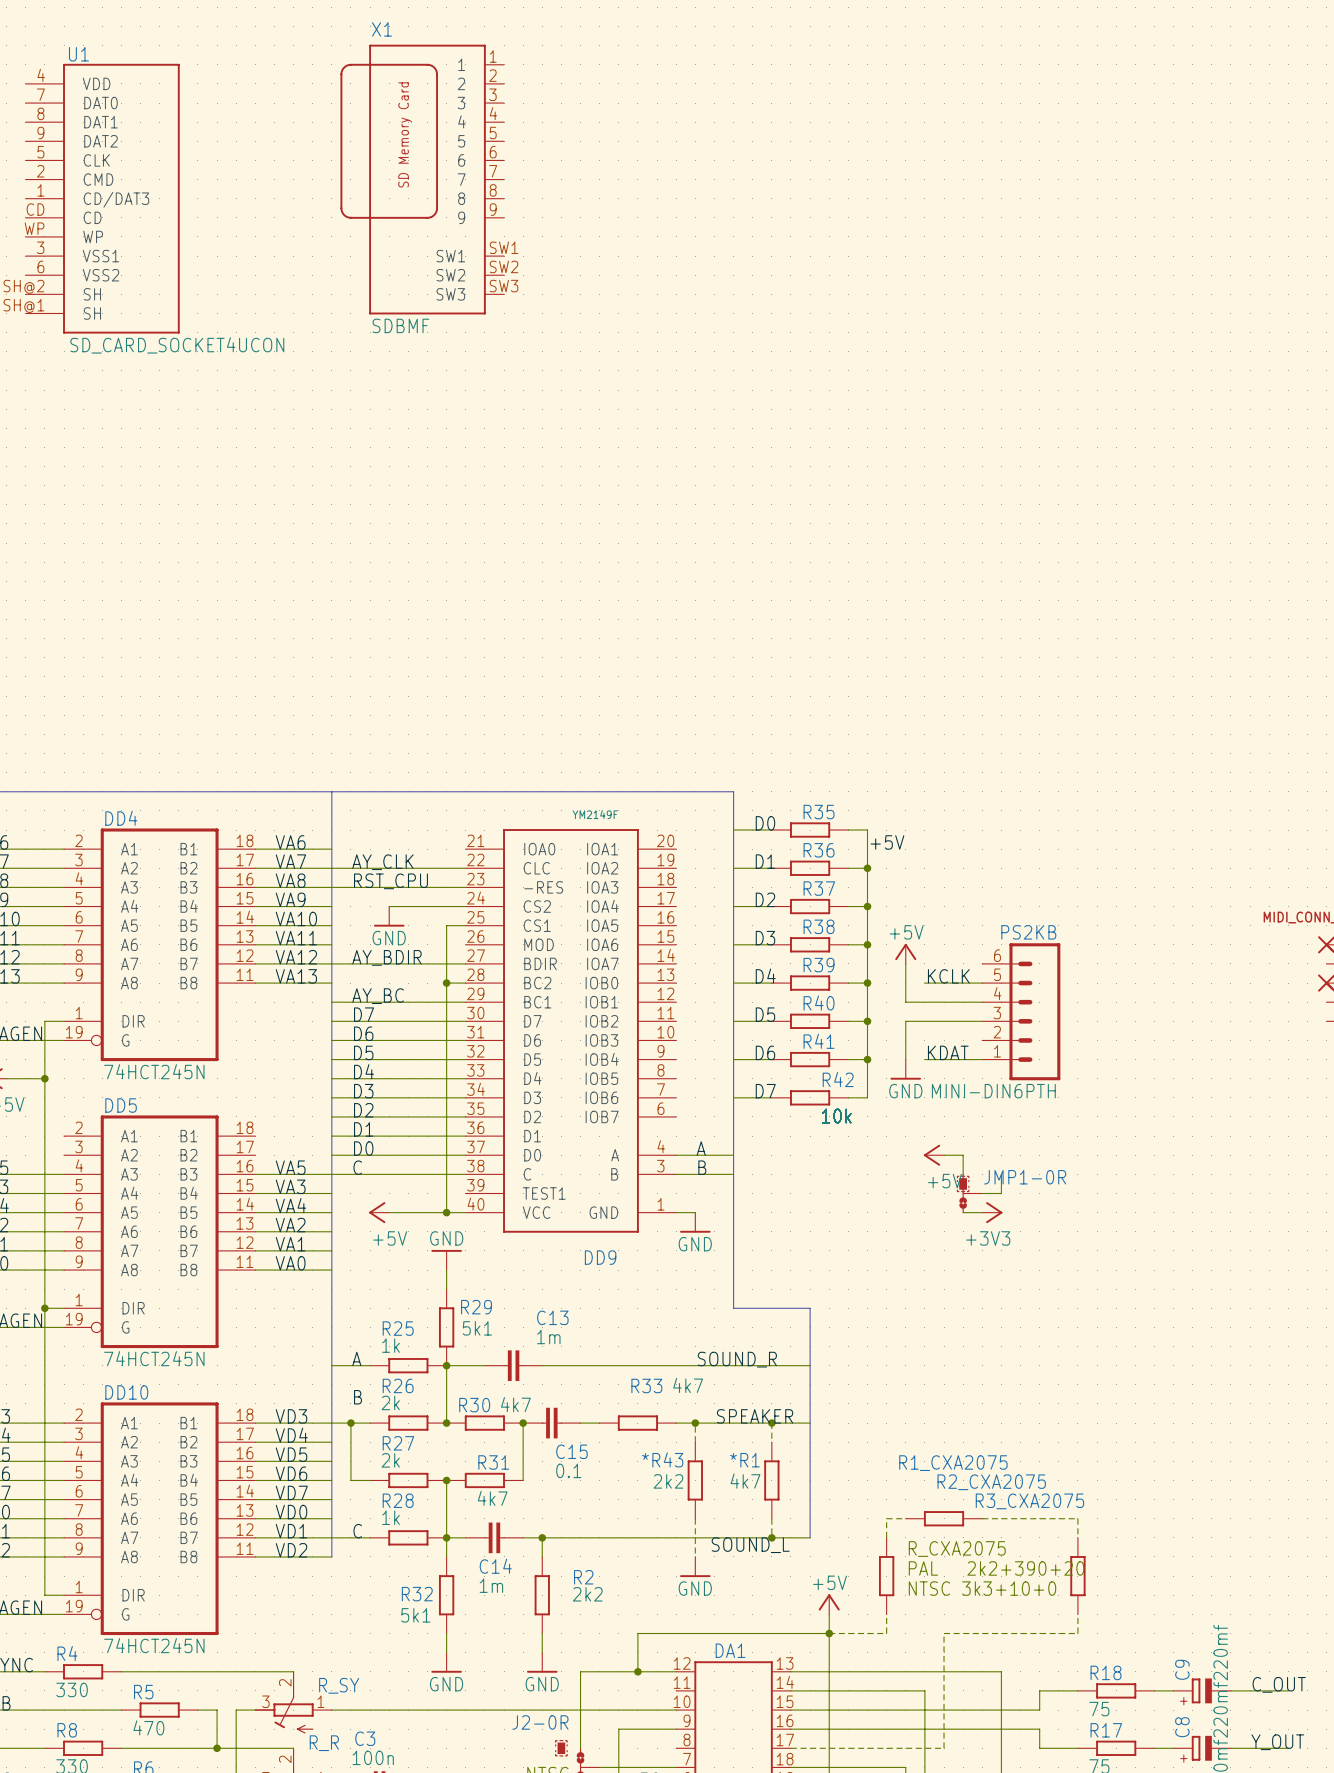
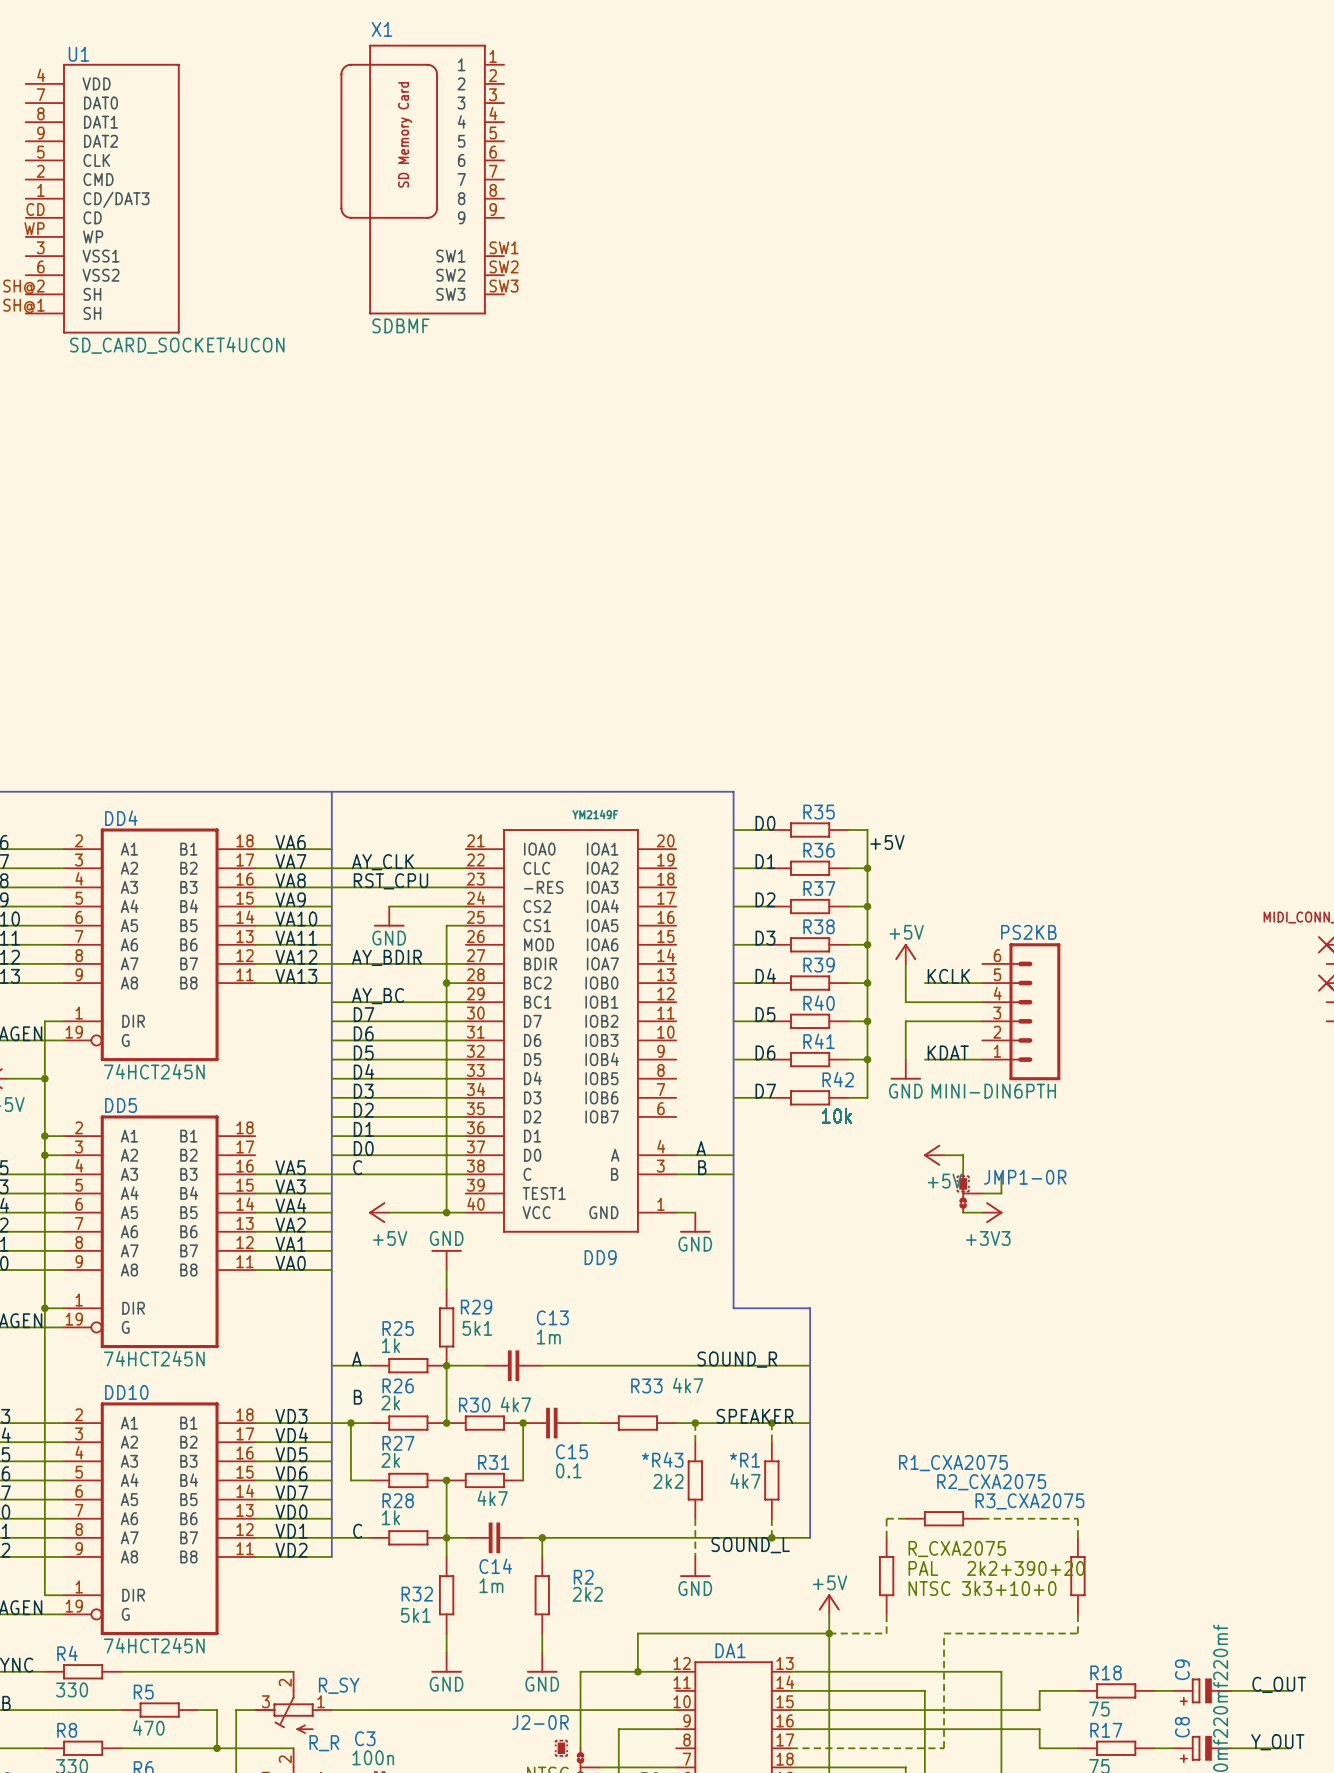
wire: none -> (44, 1136) (64, 1136)
junction: none -> (44, 1136)
wire: none -> (44, 1155) (64, 1155)
junction: none -> (44, 1155)

